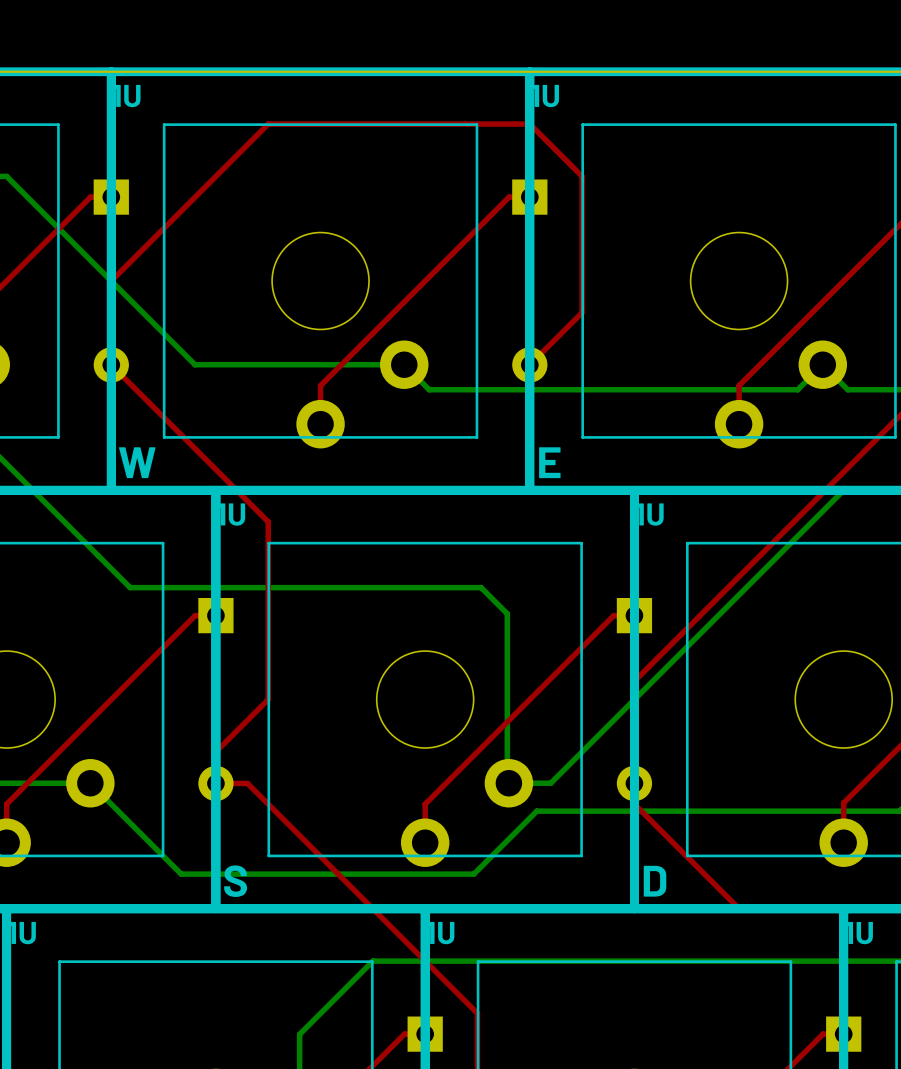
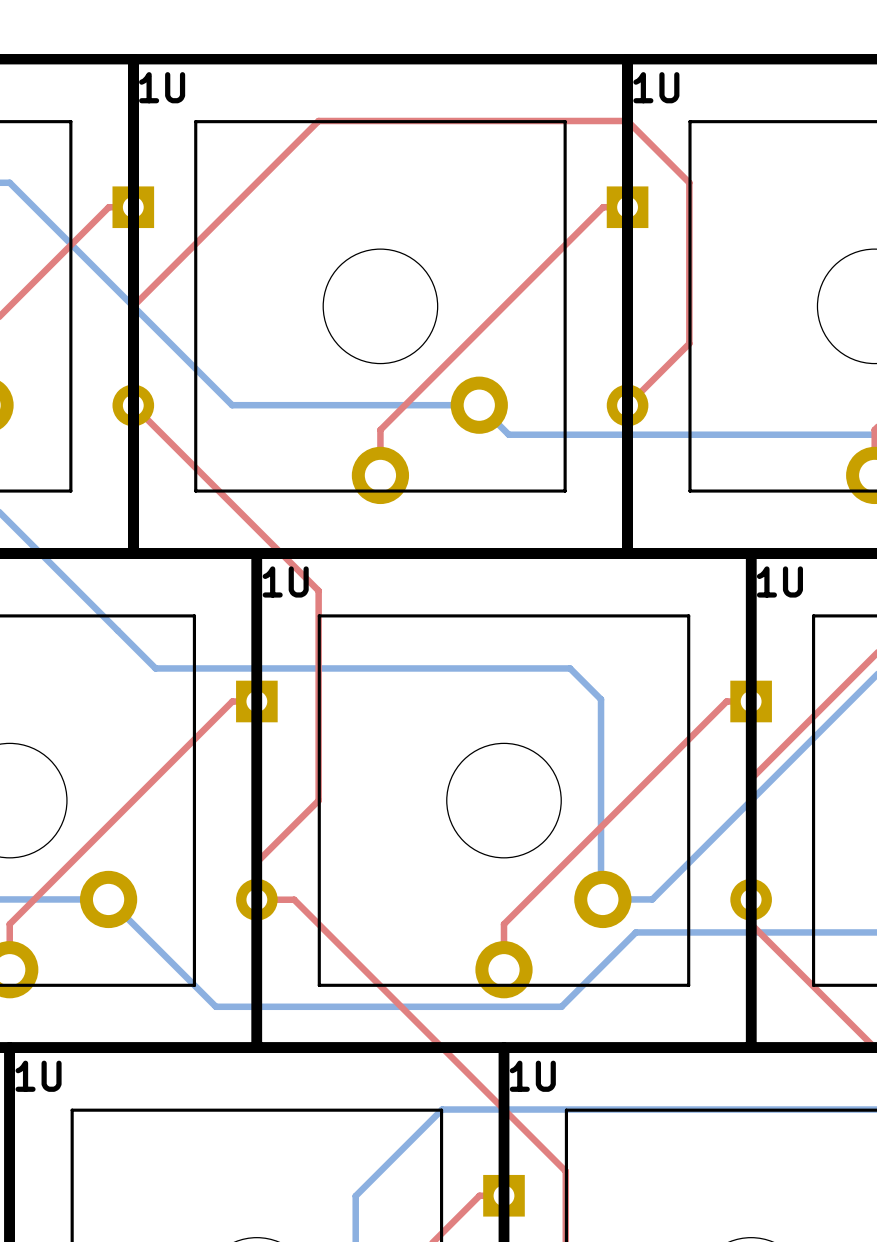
part value: W (137, 462) -> none
part value: E (549, 462) -> none
part value: S (235, 881) -> none
part value: D (655, 881) -> none

